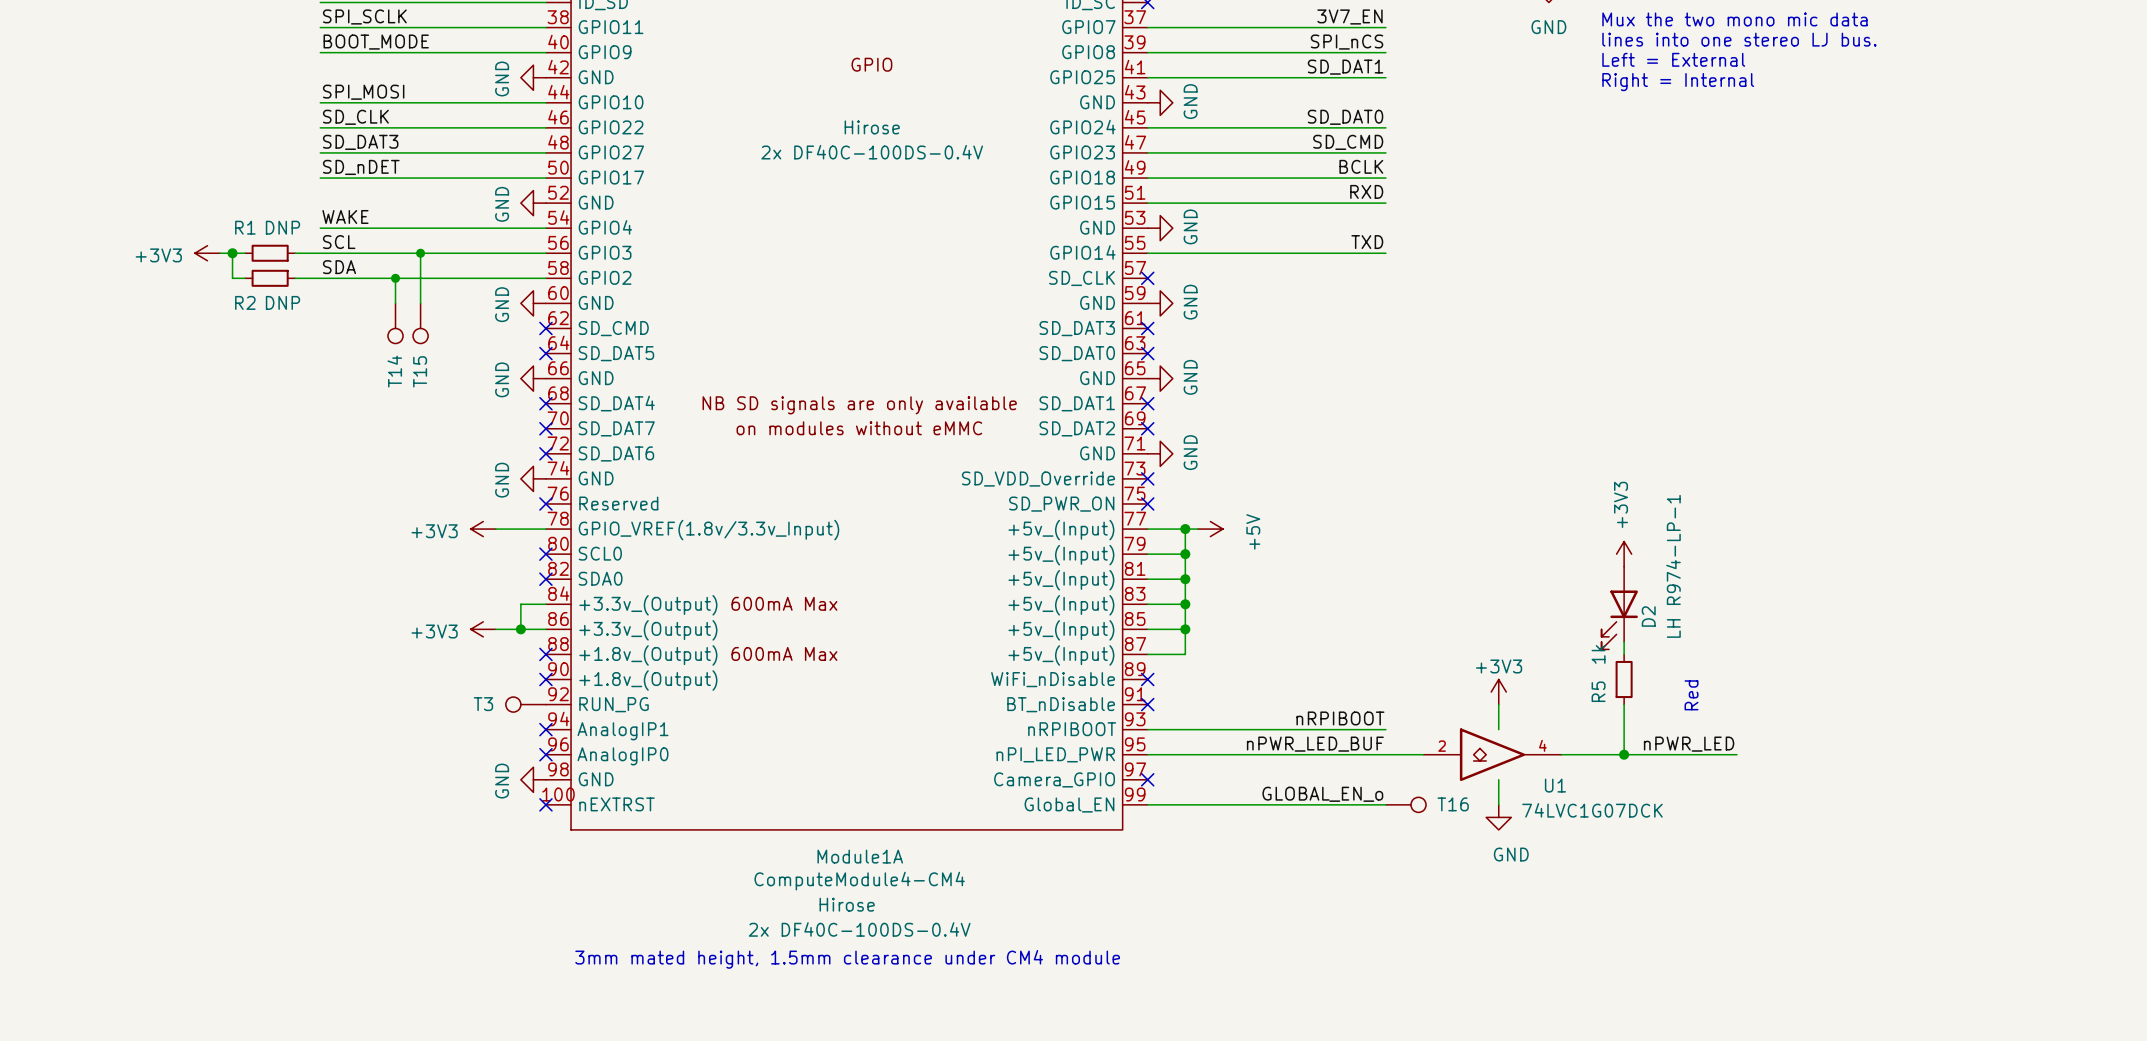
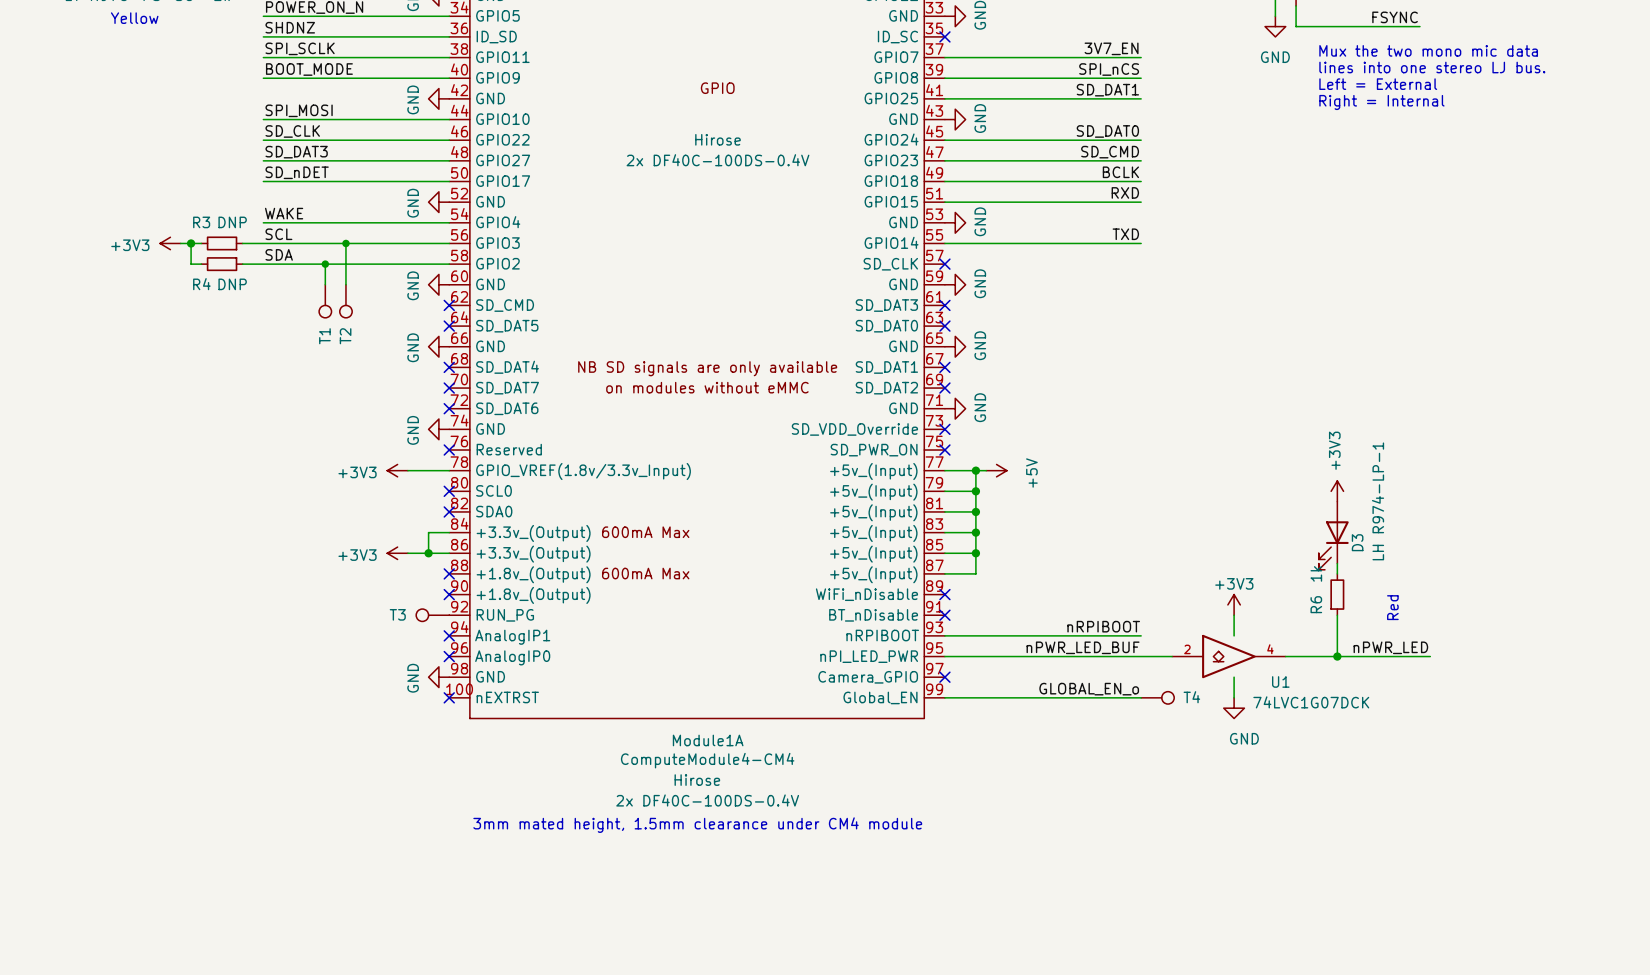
R1 name: R1 (245, 227) -> R3 (201, 222)
R2 name: R2 (245, 302) -> R4 (201, 284)
T14 name: T14 (394, 371) -> T1 (324, 336)
T15 name: T15 (420, 371) -> T2 (345, 336)
D2 name: D2 (1648, 616) -> D3 (1357, 542)
R5 name: R5 (1598, 691) -> R6 (1316, 604)
T16 name: T16 (1453, 804) -> T4 (1191, 697)

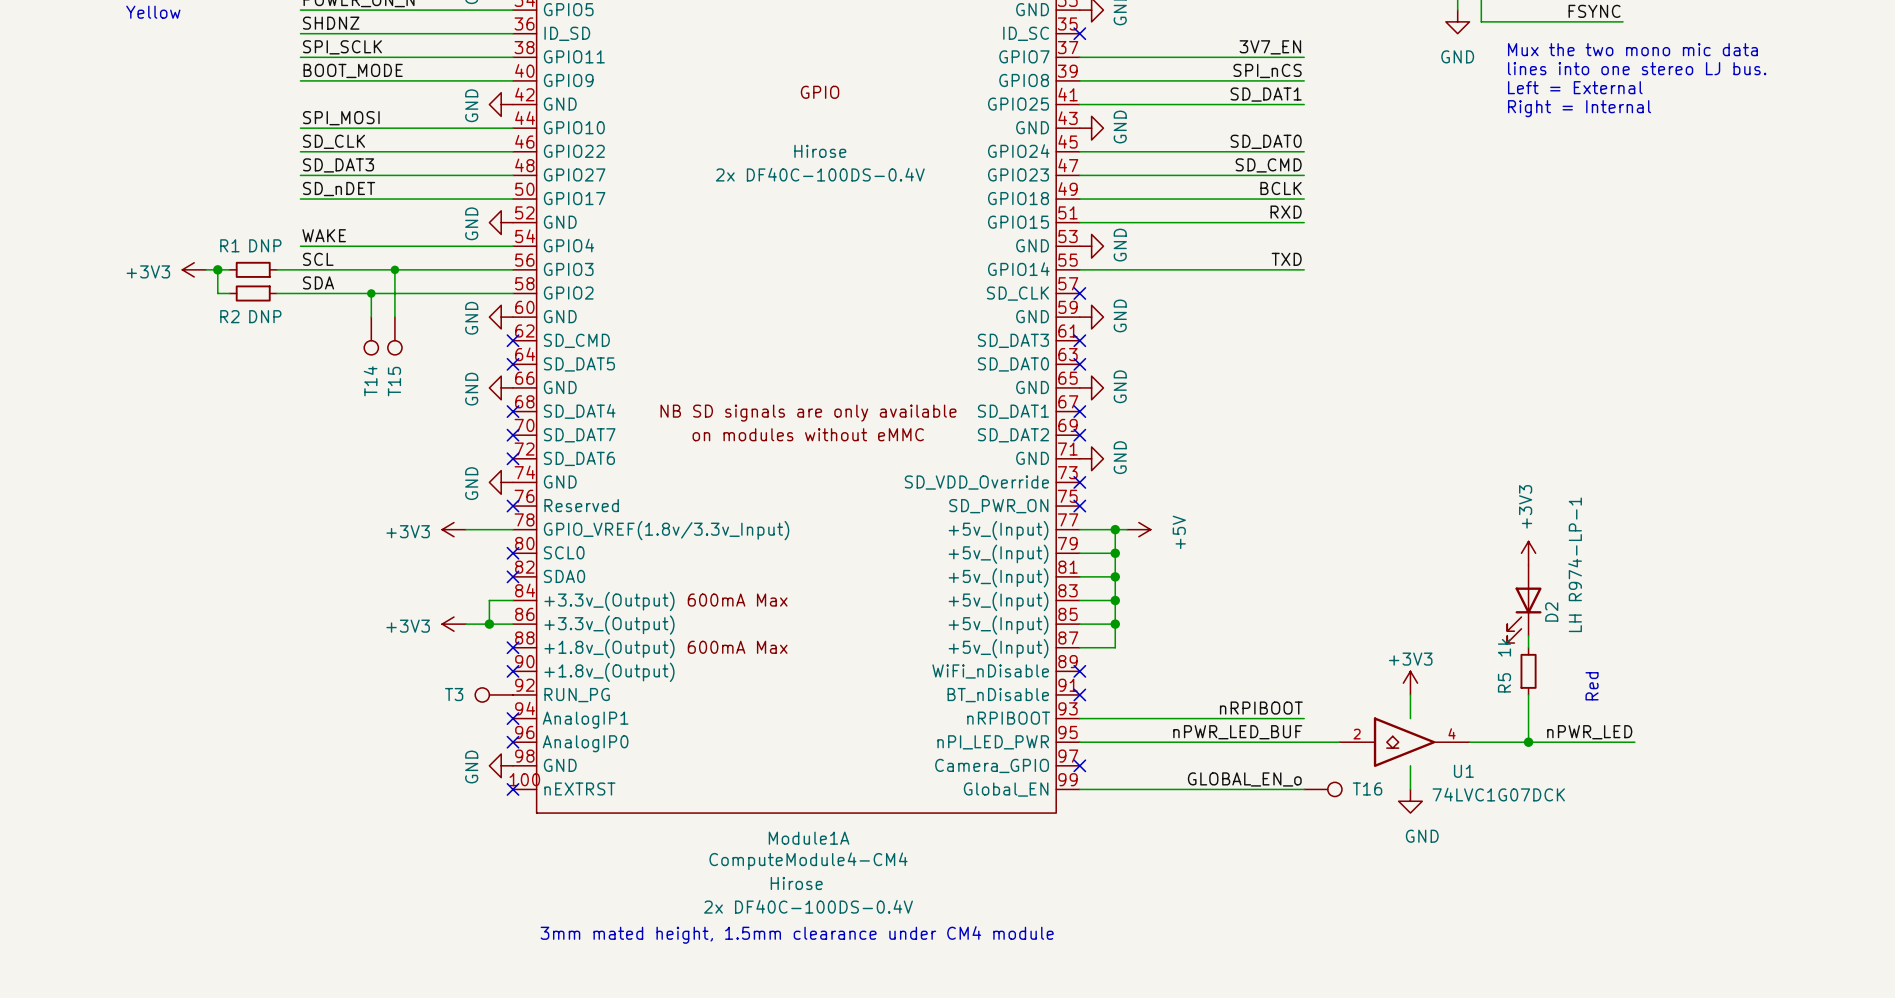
R3 name: R3 (201, 222) -> R1 (229, 245)
R4 name: R4 (201, 284) -> R2 (229, 316)
T1 name: T1 (324, 336) -> T14 (370, 381)
T2 name: T2 (345, 336) -> T15 (394, 381)
D3 name: D3 (1357, 542) -> D2 (1551, 612)
R6 name: R6 (1316, 604) -> R5 (1504, 682)
T4 name: T4 (1191, 697) -> T16 (1367, 789)

